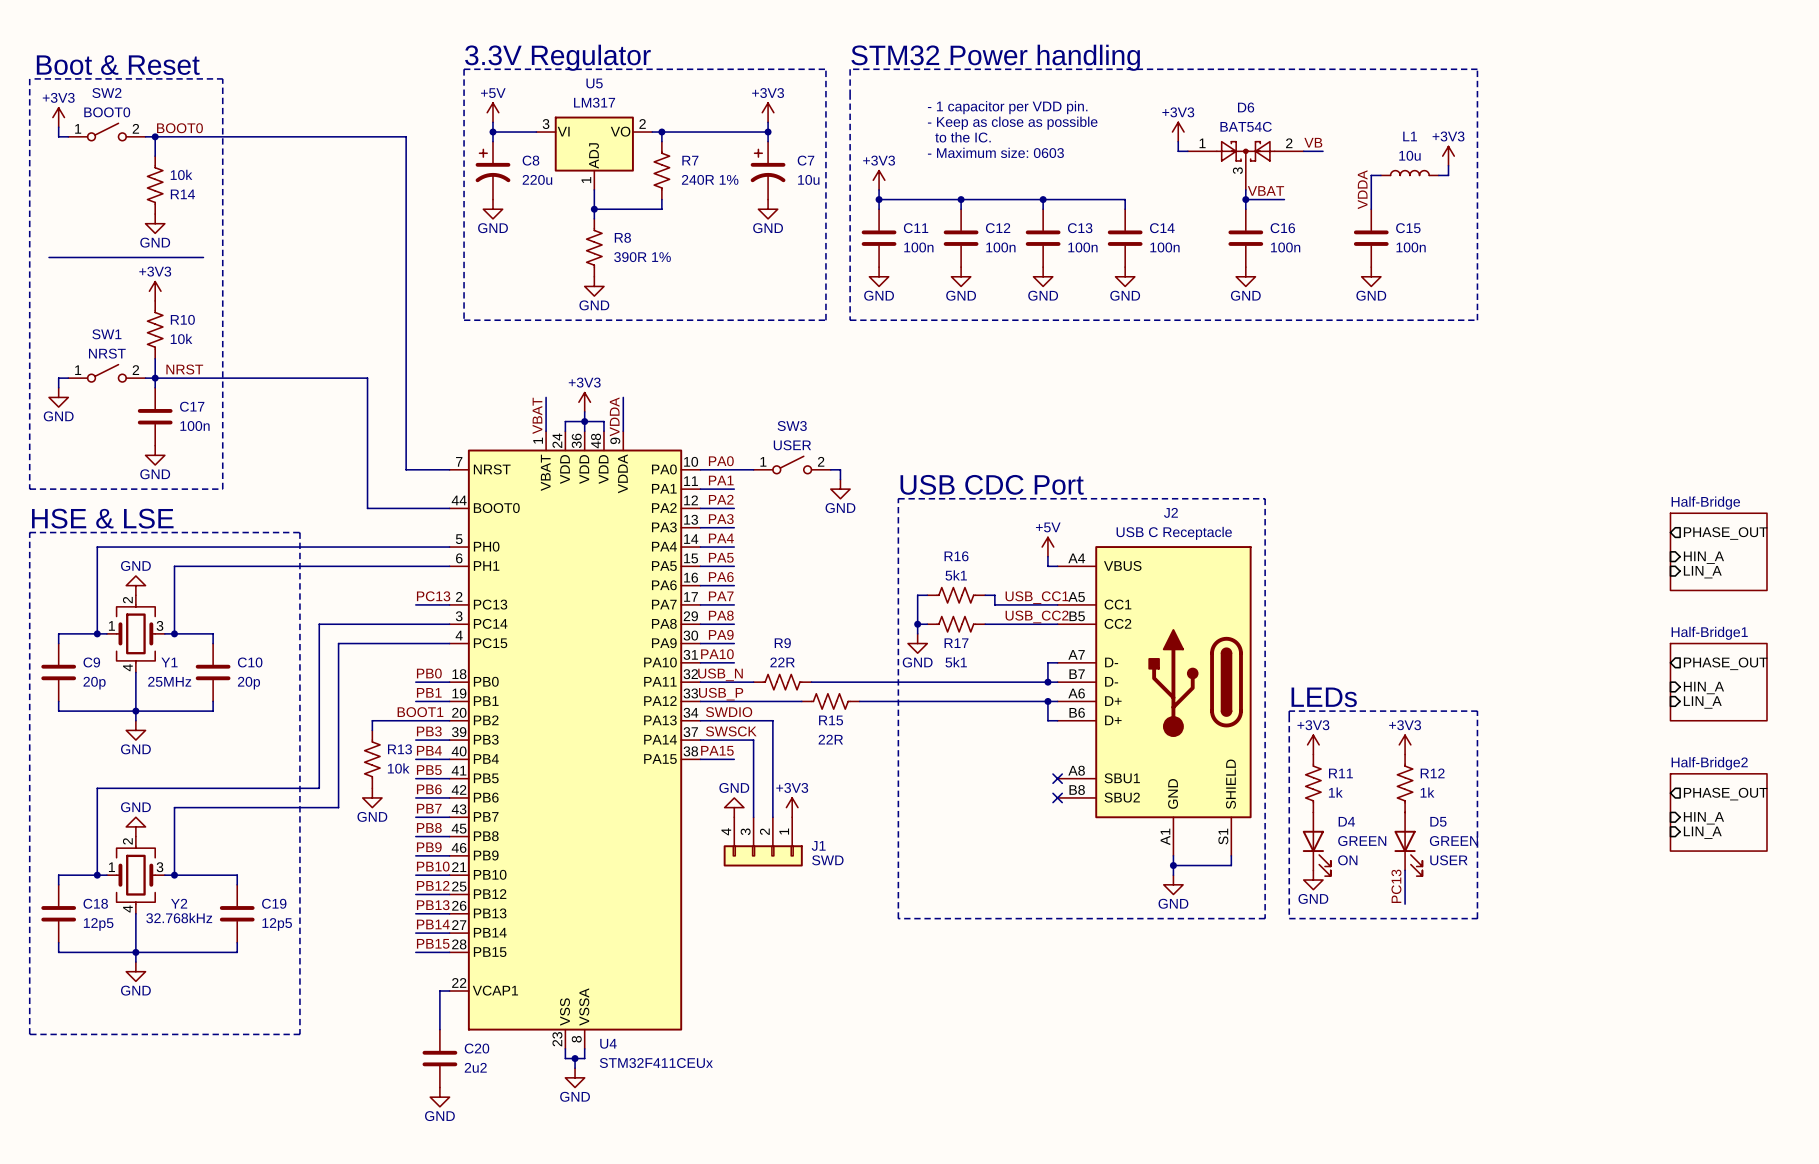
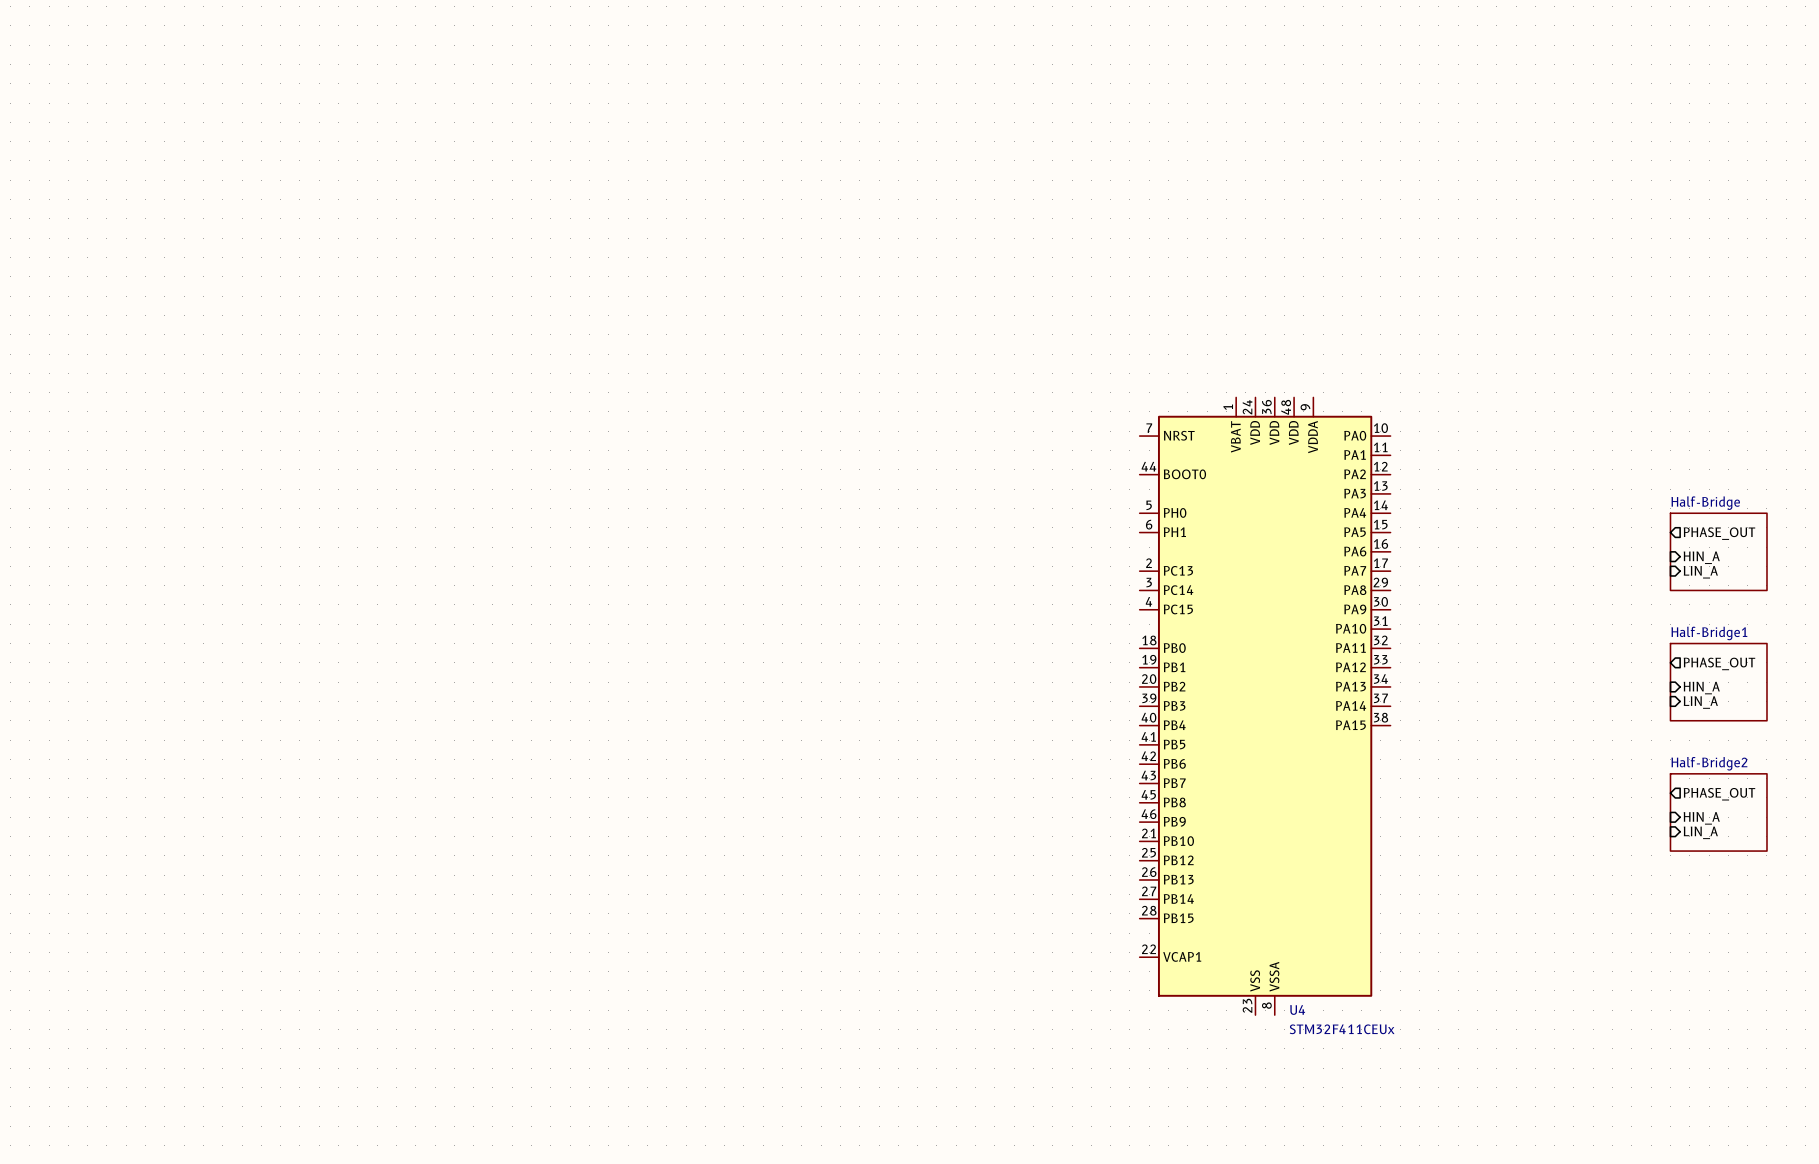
text: 3.3V Regulator (557, 57) -> none
text: STM32 Power handling (995, 57) -> none
text: Boot & Reset (118, 65) -> none
line: (464, 69) (825, 69) (825, 320) (464, 320) (464, 69) -> none
line: (850, 69) (1477, 69) (1477, 320) (850, 320) (850, 69) -> none
line: (29, 78) (29, 489) (222, 489) (222, 78) (34, 78) -> none
text: - 1 capacitor per VDD pin. (1007, 107) -> none
power symbol: +5V (492, 112) -> none
power symbol: +3V3 (768, 112) -> none
power symbol: +3V3 (58, 117) -> none
wire: (492, 122) (492, 141) -> none
wire: (768, 122) (768, 141) -> none
text: - Keep as close as possible (1012, 123) -> none
wire: (58, 127) (58, 136) (68, 136) -> none
label: BOOT0 (179, 128) -> none
SW2: BOOT0 (106, 132) -> none
wire: (492, 132) (536, 132) -> none
junction: (492, 132) -> none
wire: (652, 132) (768, 132) -> none
wire: (661, 132) (661, 141) -> none
junction: (661, 132) -> none
junction: (768, 132) -> none
power symbol: +3V3 (1178, 132) -> none
wire: (145, 136) (406, 136) (406, 469) (449, 469) -> none
wire: (155, 136) (155, 156) -> none
junction: (155, 136) -> none
text: to the IC. (963, 137) -> none
wire: (1178, 141) (1178, 151) (1187, 151) -> none
label: VB (1313, 142) -> none
wire: (1303, 151) (1323, 151) -> none
text: - Maximum size: 0603 (995, 152) -> none
U5: LM317 (594, 153) -> none
power symbol: +3V3 (1448, 156) -> none
D6: BAT54C (1245, 165) -> none
wire: (1448, 165) (1448, 175) (1438, 175) -> none
C8: 220u (492, 170) -> none
R7: 240R 1% (661, 170) -> none
C7: 10u (768, 170) -> none
L1: 10u (1409, 173) -> none
wire: (1380, 175) (1371, 175) (1371, 209) -> none
power symbol: +3V3 (879, 180) -> none
R14: 10k (155, 185) -> none
wire: (594, 189) (594, 218) -> none
wire: (879, 189) (879, 209) -> none
wire: (1245, 189) (1245, 209) -> none
label: VDDA (1362, 189) -> none
label: VBAT (1265, 190) -> none
wire: (661, 199) (661, 209) (594, 209) -> none
wire: (879, 199) (1125, 199) (1125, 209) -> none
junction: (879, 199) -> none
wire: (961, 199) (961, 209) -> none
junction: (961, 199) -> none
wire: (1043, 199) (1043, 209) -> none
junction: (1043, 199) -> none
wire: (1245, 199) (1284, 199) -> none
junction: (1245, 199) -> none
power symbol: GND (492, 209) -> none
junction: (594, 209) -> none
power symbol: GND (768, 209) -> none
power symbol: GND (155, 223) -> none
C11: 100n (879, 238) -> none
C12: 100n (961, 238) -> none
C13: 100n (1043, 238) -> none
C14: 100n (1125, 238) -> none
C16: 100n (1245, 238) -> none
C15: 100n (1371, 238) -> none
R8: 390R 1% (594, 247) -> none
line: (49, 257) (203, 257) -> none
power symbol: GND (879, 276) -> none
power symbol: GND (961, 276) -> none
power symbol: GND (1043, 276) -> none
power symbol: GND (1125, 276) -> none
power symbol: GND (1245, 276) -> none
power symbol: GND (1371, 276) -> none
power symbol: GND (594, 286) -> none
power symbol: +3V3 (155, 291) -> none
R10: 10k (155, 329) -> none
wire: (155, 358) (155, 387) -> none
label: NRST (184, 369) -> none
SW1: NRST (106, 373) -> none
wire: (68, 378) (58, 378) (58, 387) -> none
wire: (145, 378) (367, 378) (367, 508) (449, 508) -> none
junction: (155, 378) -> none
power symbol: GND (58, 397) -> none
wire: (546, 397) (546, 431) -> none
wire: (623, 397) (623, 431) -> none
power symbol: +3V3 (584, 402) -> none
wire: (584, 411) (584, 431) -> none
label: VBAT (537, 415) -> none
C17: 100n (155, 416) -> none
label: VDDA (614, 416) -> none
junction: (584, 421) -> none
wire: (565, 431) (565, 421) (603, 421) (603, 431) -> none
power symbol: GND (155, 455) -> none
label: PA0 (721, 461) -> none
SW3: USER (792, 464) -> none
wire: (700, 469) (753, 469) -> none
wire: (830, 469) (840, 469) (840, 479) -> none
label: PA1 (721, 480) -> none
text: USB CDC Port (992, 484) -> none
wire: (700, 489) (734, 489) -> none
power symbol: GND (840, 489) -> none
line: (898, 498) (1265, 498) (1265, 918) (898, 918) (898, 498) -> none
label: PA2 (721, 499) -> none
wire: (700, 508) (734, 508) -> none
text: HSE & LSE (102, 518) -> none
label: PA3 (721, 519) -> none
wire: (700, 527) (734, 527) -> none
line: (29, 532) (29, 1034) (299, 1034) (299, 532) (29, 532) -> none
label: PA4 (721, 538) -> none
wire: (449, 547) (97, 547) (97, 633) -> none
wire: (700, 547) (734, 547) -> none
power symbol: +5V (1047, 547) -> none
wire: (1047, 556) (1047, 566) (1057, 566) -> none
label: PA5 (721, 557) -> none
wire: (449, 566) (174, 566) (174, 633) -> none
wire: (700, 566) (734, 566) -> none
label: PA6 (721, 577) -> none
power symbol: GND (135, 585) -> none
wire: (700, 585) (734, 585) -> none
wire: (927, 595) (917, 595) (917, 633) -> none
R16: 5k1 (956, 595) -> none
wire: (985, 595) (994, 595) (994, 604) (1057, 604) -> none
label: PC13 (433, 596) -> none
label: PA7 (721, 596) -> none
label: USB_CC1 (1037, 597) -> none
wire: (415, 604) (449, 604) -> none
wire: (700, 604) (734, 604) -> none
label: PA8 (721, 615) -> none
label: USB_CC2 (1037, 616) -> none
wire: (449, 624) (319, 624) (319, 788) (97, 788) (97, 875) -> none
wire: (700, 624) (734, 624) -> none
wire: (917, 624) (927, 624) -> none
junction: (917, 624) -> none
R17: 5k1 (956, 624) -> none
wire: (985, 624) (1057, 624) -> none
junction: (97, 633) -> none
wire: (106, 633) (58, 633) (58, 643) -> none
Y1: 25MHz (135, 633) -> none
wire: (164, 633) (213, 633) (213, 643) -> none
junction: (174, 633) -> none
label: PA9 (721, 634) -> none
wire: (449, 643) (338, 643) (338, 807) (174, 807) (174, 875) -> none
wire: (700, 643) (734, 643) -> none
power symbol: GND (917, 643) -> none
label: PA10 (717, 654) -> none
wire: (700, 662) (734, 662) -> none
wire: (1057, 662) (1047, 662) (1047, 682) -> none
C9: 20p (58, 672) -> none
wire: (135, 672) (135, 720) -> none
C10: 20p (213, 672) -> none
label: PB0 (429, 673) -> none
label: USB_N (720, 674) -> none
wire: (415, 682) (449, 682) -> none
wire: (700, 682) (753, 682) -> none
R9: 22R (782, 682) -> none
wire: (811, 682) (1057, 682) -> none
junction: (1047, 682) -> none
label: PB1 (429, 692) -> none
label: USB_P (721, 694) -> none
text: LEDs (1324, 697) -> none
J2: USB C Receptacle (1154, 700) -> none
wire: (58, 701) (58, 711) (213, 711) (213, 701) -> none
wire: (415, 701) (449, 701) -> none
wire: (700, 701) (801, 701) -> none
R15: 22R (830, 701) -> none
wire: (859, 701) (1057, 701) -> none
wire: (1047, 701) (1047, 720) (1057, 720) -> none
junction: (1047, 701) -> none
junction: (135, 711) -> none
line: (1289, 711) (1289, 918) (1477, 918) (1477, 711) (1289, 711) -> none
label: BOOT1 (420, 712) -> none
label: SWDIO (729, 712) -> none
wire: (449, 720) (372, 720) (372, 730) -> none
wire: (700, 720) (772, 720) (772, 817) -> none
power symbol: GND (135, 730) -> none
label: PB3 (429, 731) -> none
label: SWSCK (731, 731) -> none
wire: (415, 740) (449, 740) -> none
U4 position: (575, 740) -> (1265, 706)
wire: (700, 740) (753, 740) (753, 817) -> none
power symbol: +3V3 (1313, 744) -> none
power symbol: +3V3 (1405, 744) -> none
label: PB4 (429, 750) -> none
label: PA15 (717, 750) -> none
R13: 10k (372, 759) -> none
wire: (415, 759) (449, 759) -> none
wire: (700, 759) (734, 759) -> none
label: PB5 (429, 770) -> none
wire: (415, 778) (449, 778) -> none
no-connect mark: (1057, 778) -> none
R11: 1k (1313, 783) -> none
R12: 1k (1405, 783) -> none
label: PB6 (429, 789) -> none
power symbol: GND (372, 797) -> none
wire: (415, 797) (449, 797) -> none
no-connect mark: (1057, 797) -> none
power symbol: GND (734, 807) -> none
power symbol: +3V3 (792, 807) -> none
label: PB7 (429, 808) -> none
wire: (415, 817) (449, 817) -> none
power symbol: GND (135, 826) -> none
label: PB8 (429, 827) -> none
wire: (415, 836) (449, 836) -> none
J1: SWD (763, 841) -> none
D4: GREEN (1316, 844) -> none
D5: GREEN (1408, 844) -> none
label: PB9 (429, 847) -> none
wire: (415, 855) (449, 855) -> none
junction: (1173, 865) -> none
label: PB10 (433, 866) -> none
wire: (1405, 870) (1405, 904) -> none
junction: (97, 875) -> none
wire: (106, 875) (58, 875) (58, 884) -> none
Y2: 32.768kHz (135, 875) -> none
wire: (164, 875) (237, 875) (237, 884) -> none
junction: (174, 875) -> none
wire: (415, 875) (449, 875) -> none
power symbol: GND (1313, 880) -> none
power symbol: GND (1173, 884) -> none
label: PB12 (433, 885) -> none
label: PC13 (1396, 886) -> none
wire: (415, 894) (449, 894) -> none
label: PB13 (433, 905) -> none
C18: 12p5 (58, 913) -> none
wire: (135, 913) (135, 962) -> none
C19: 12p5 (237, 913) -> none
wire: (415, 913) (449, 913) -> none
label: PB14 (433, 924) -> none
wire: (415, 933) (449, 933) -> none
wire: (58, 942) (58, 952) (237, 952) (237, 942) -> none
label: PB15 (433, 943) -> none
junction: (135, 952) -> none
wire: (415, 952) (449, 952) -> none
power symbol: GND (135, 971) -> none
wire: (449, 990) (439, 990) (439, 1029) -> none
wire: (565, 1048) (565, 1058) (584, 1058) (584, 1048) -> none
C20: 2u2 (439, 1058) -> none
wire: (575, 1058) (575, 1068) -> none
junction: (575, 1058) -> none
power symbol: GND (575, 1077) -> none
power symbol: GND (439, 1097) -> none

